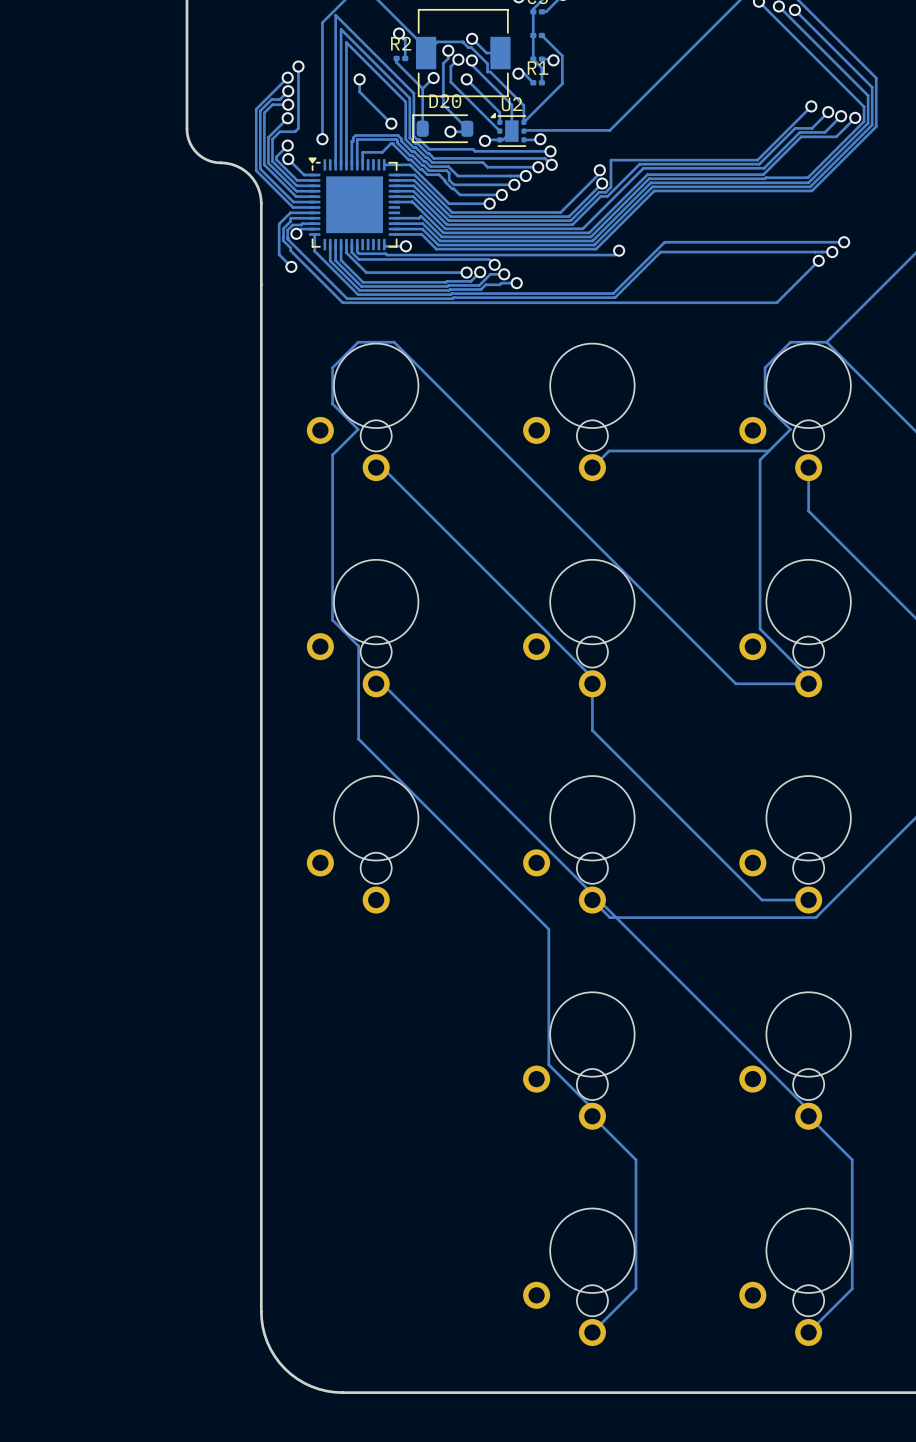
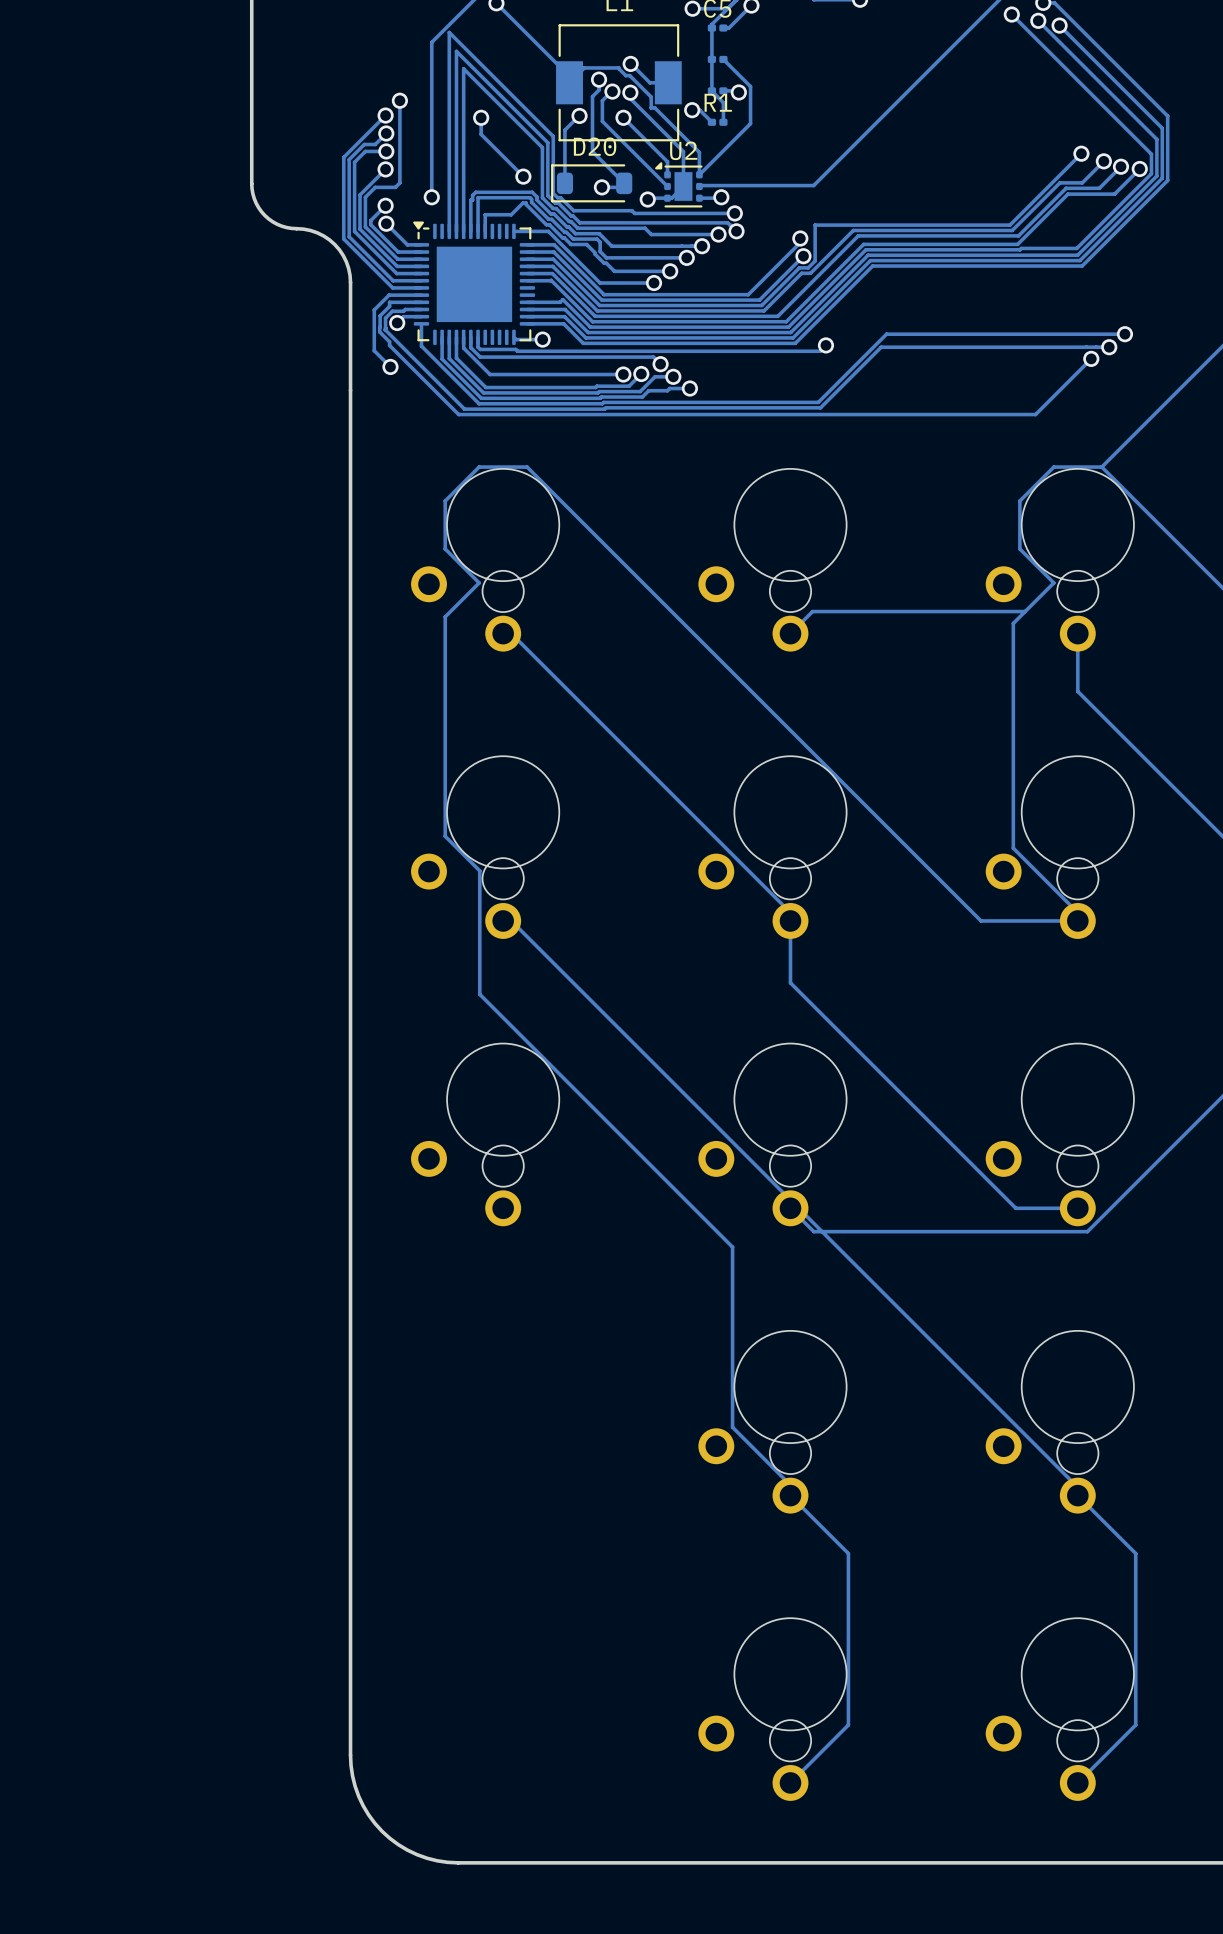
track: (399, 33) (405, 39) (405, 58) -> none
via: (399, 33) -> none
track: (396, 58) (396, 62) (422, 88) -> none
R2: (400, 58) -> none

